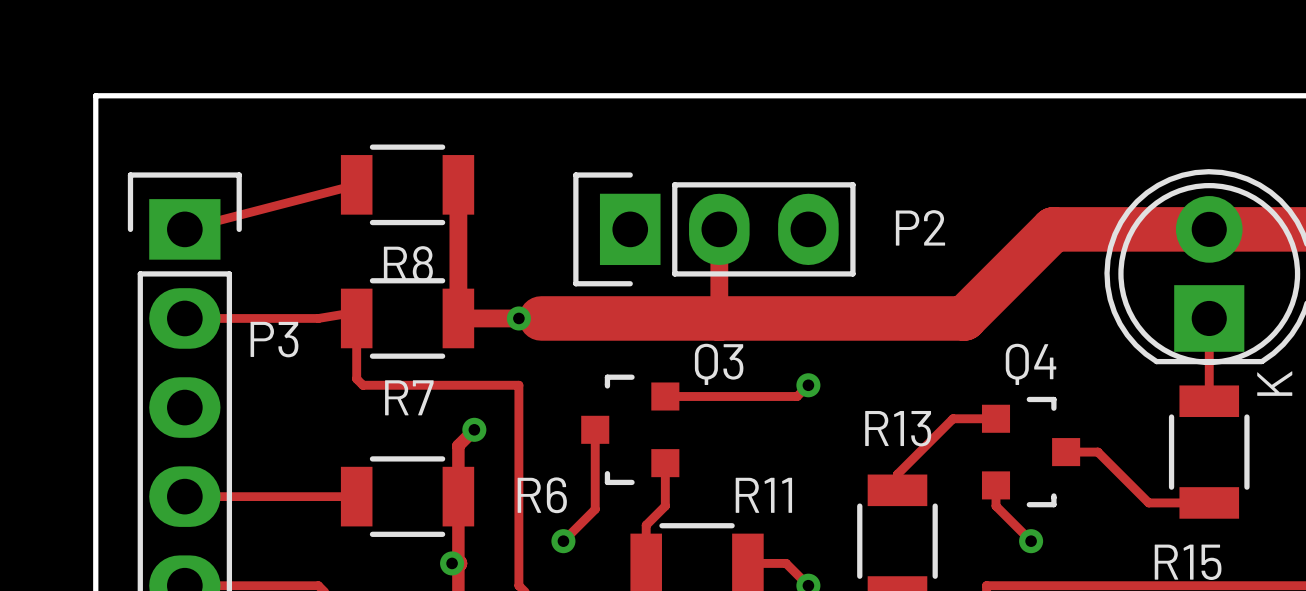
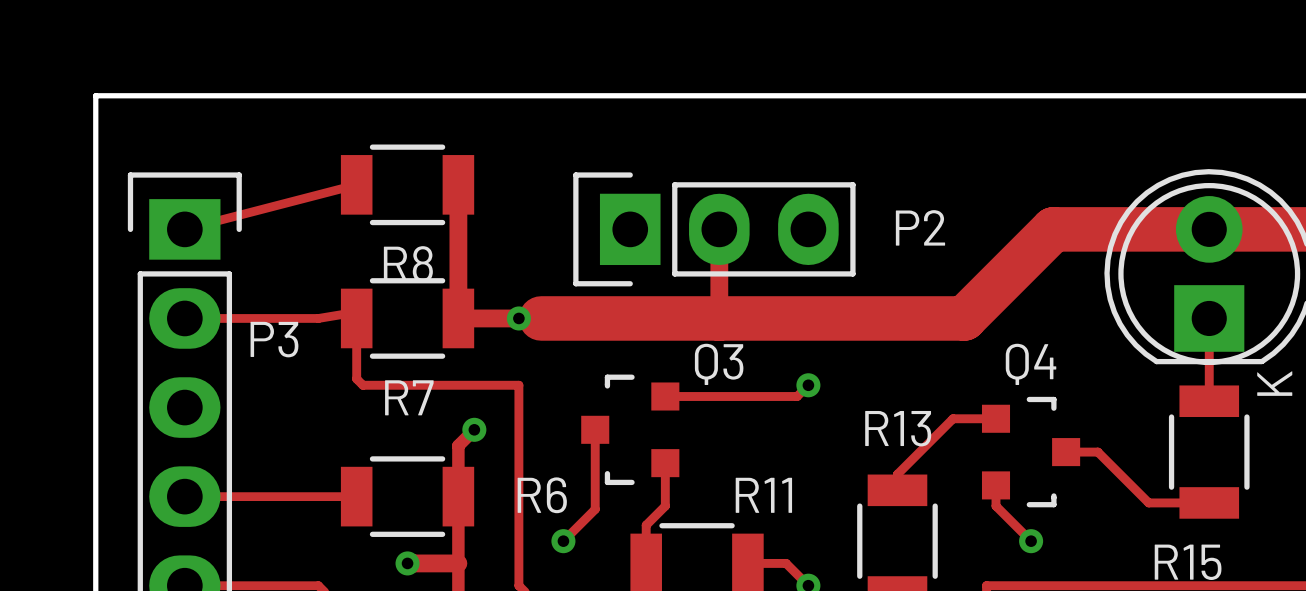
track: none -> (407, 563) (452, 563)
via position: (452, 563) -> (407, 563)

